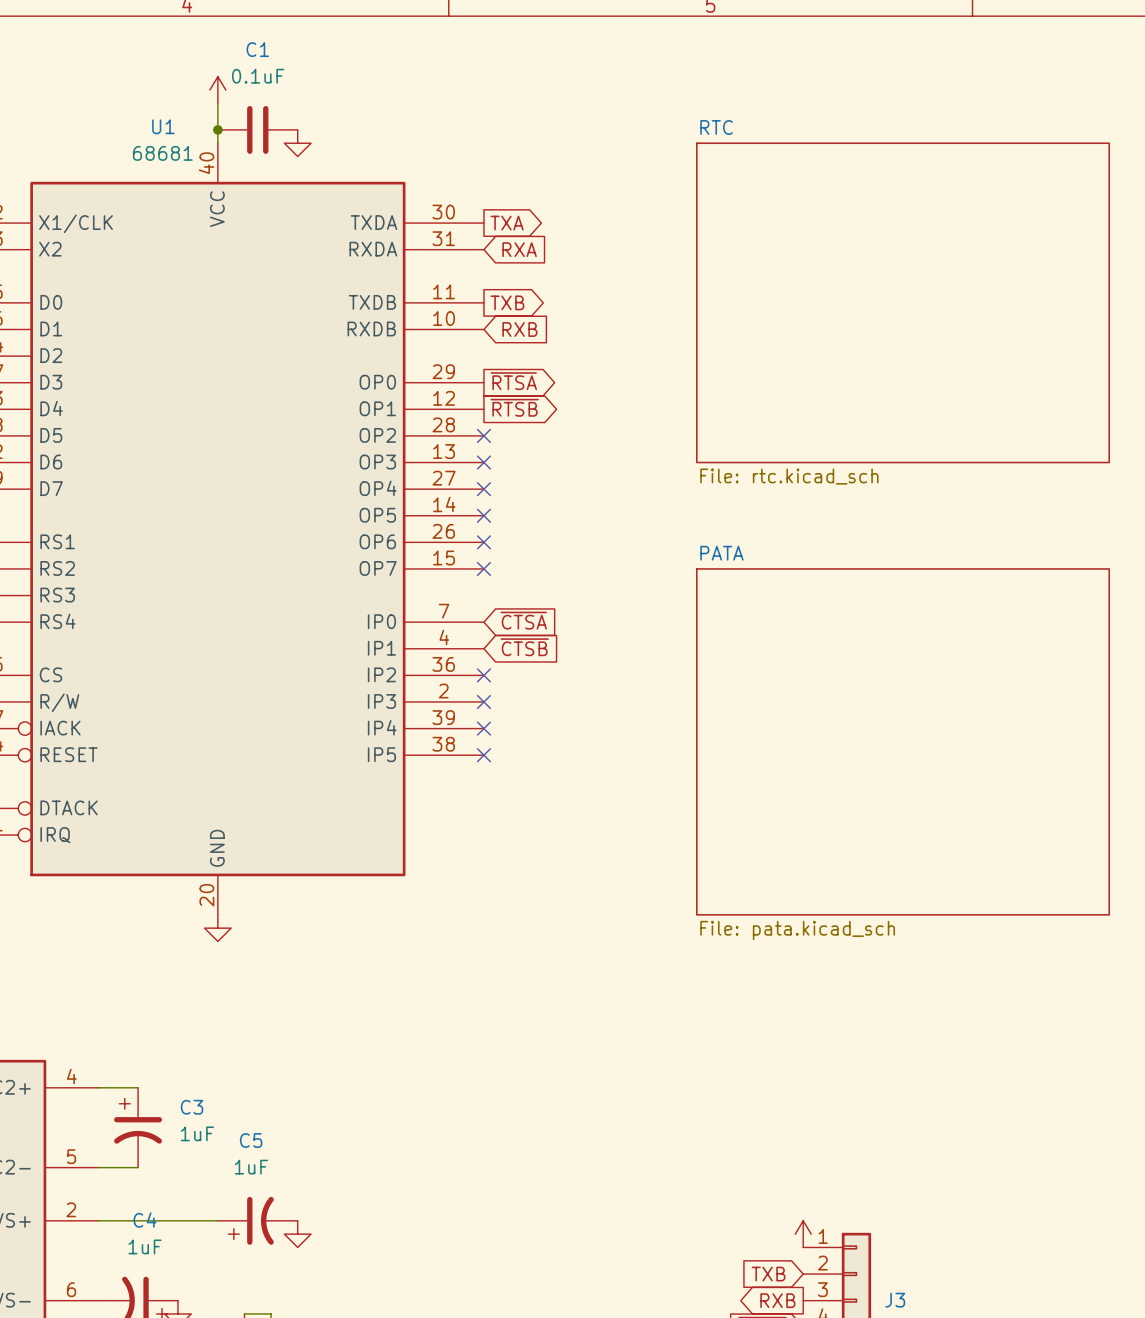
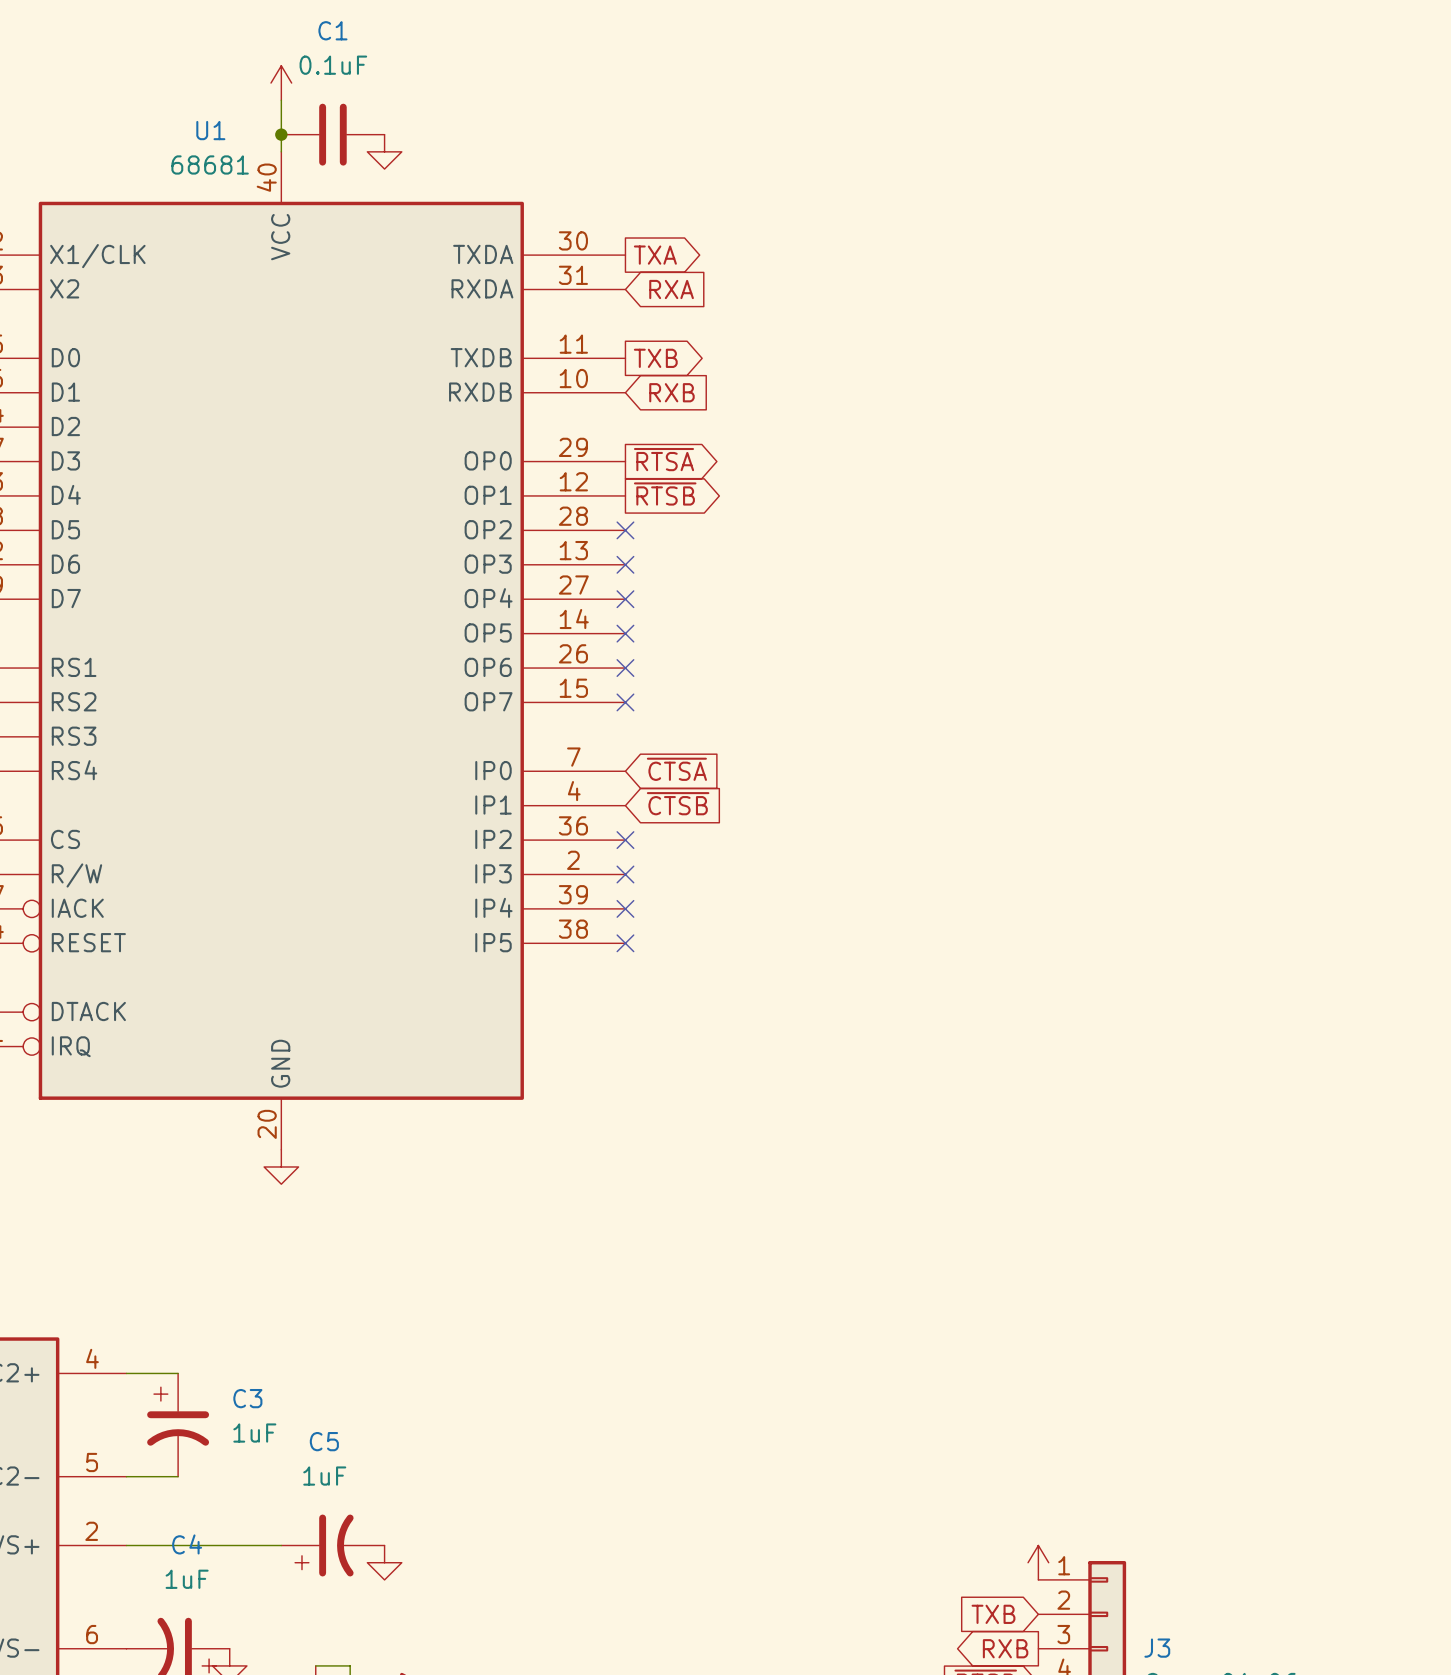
sheet RTC: File: rtc.kicad_sch (903, 302) -> none
sheet PATA: File: pata.kicad_sch (903, 741) -> none

